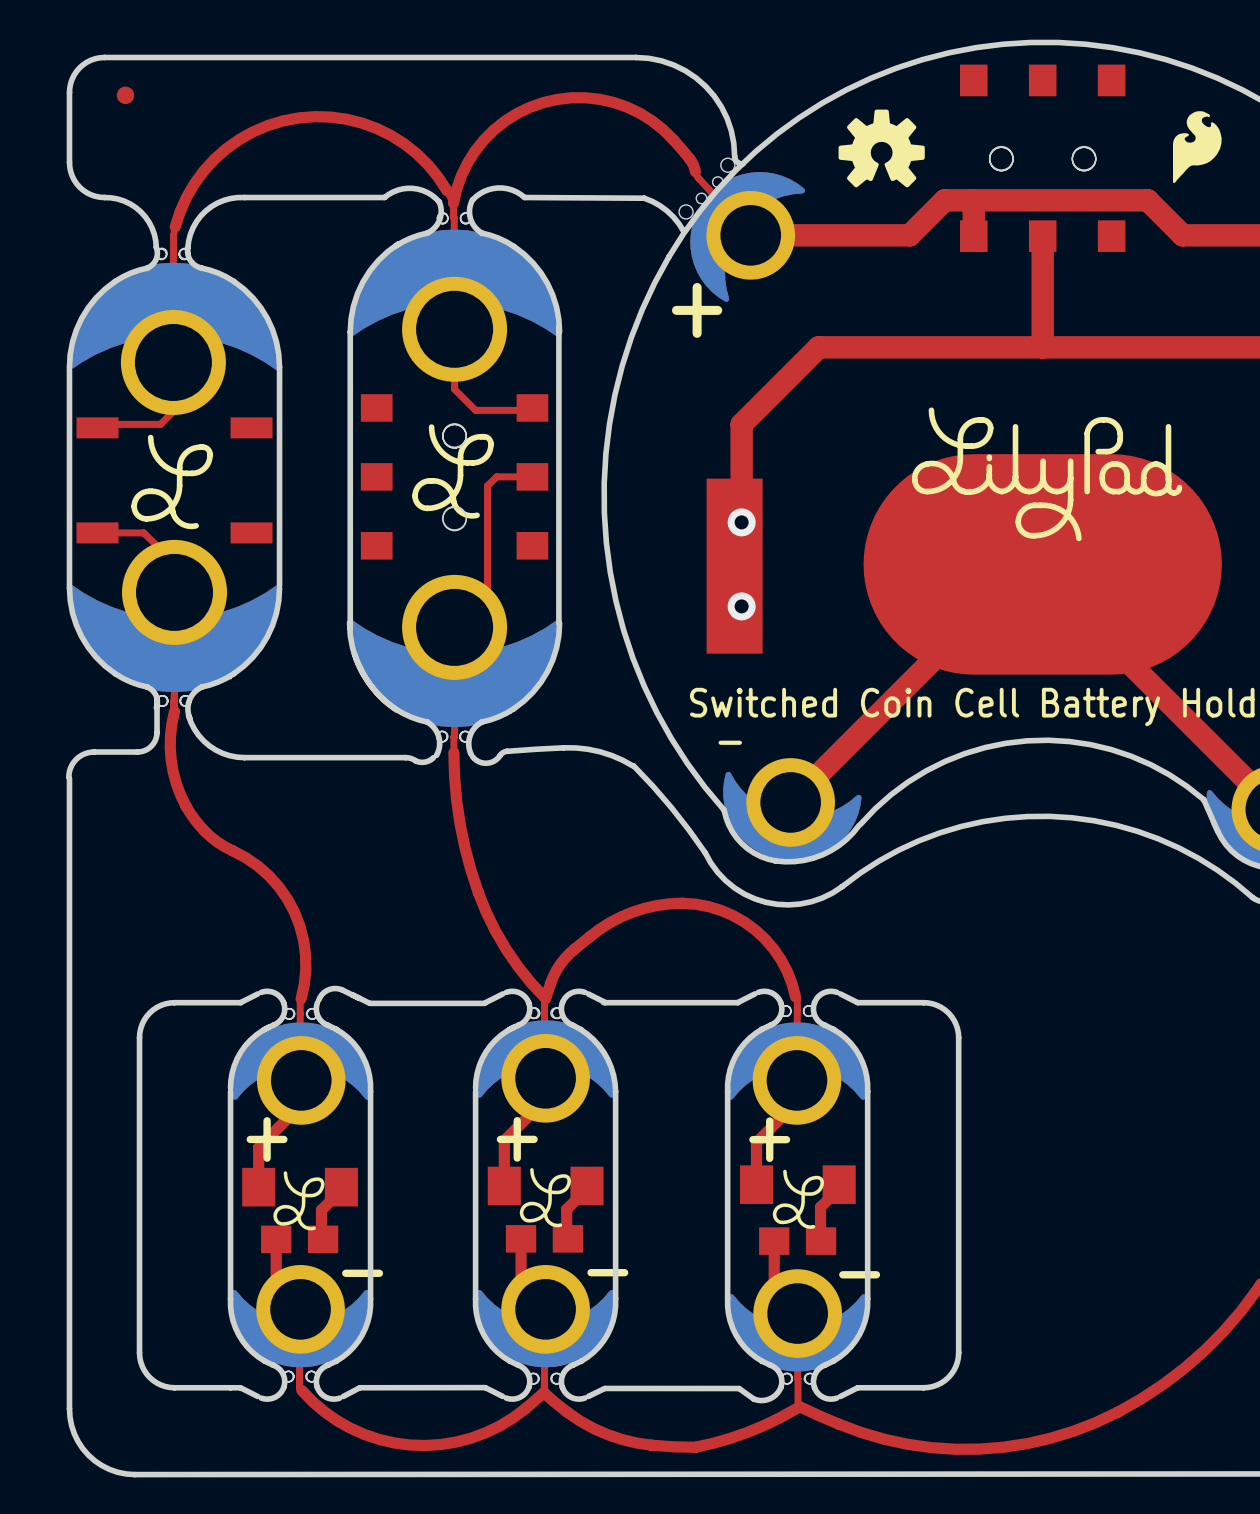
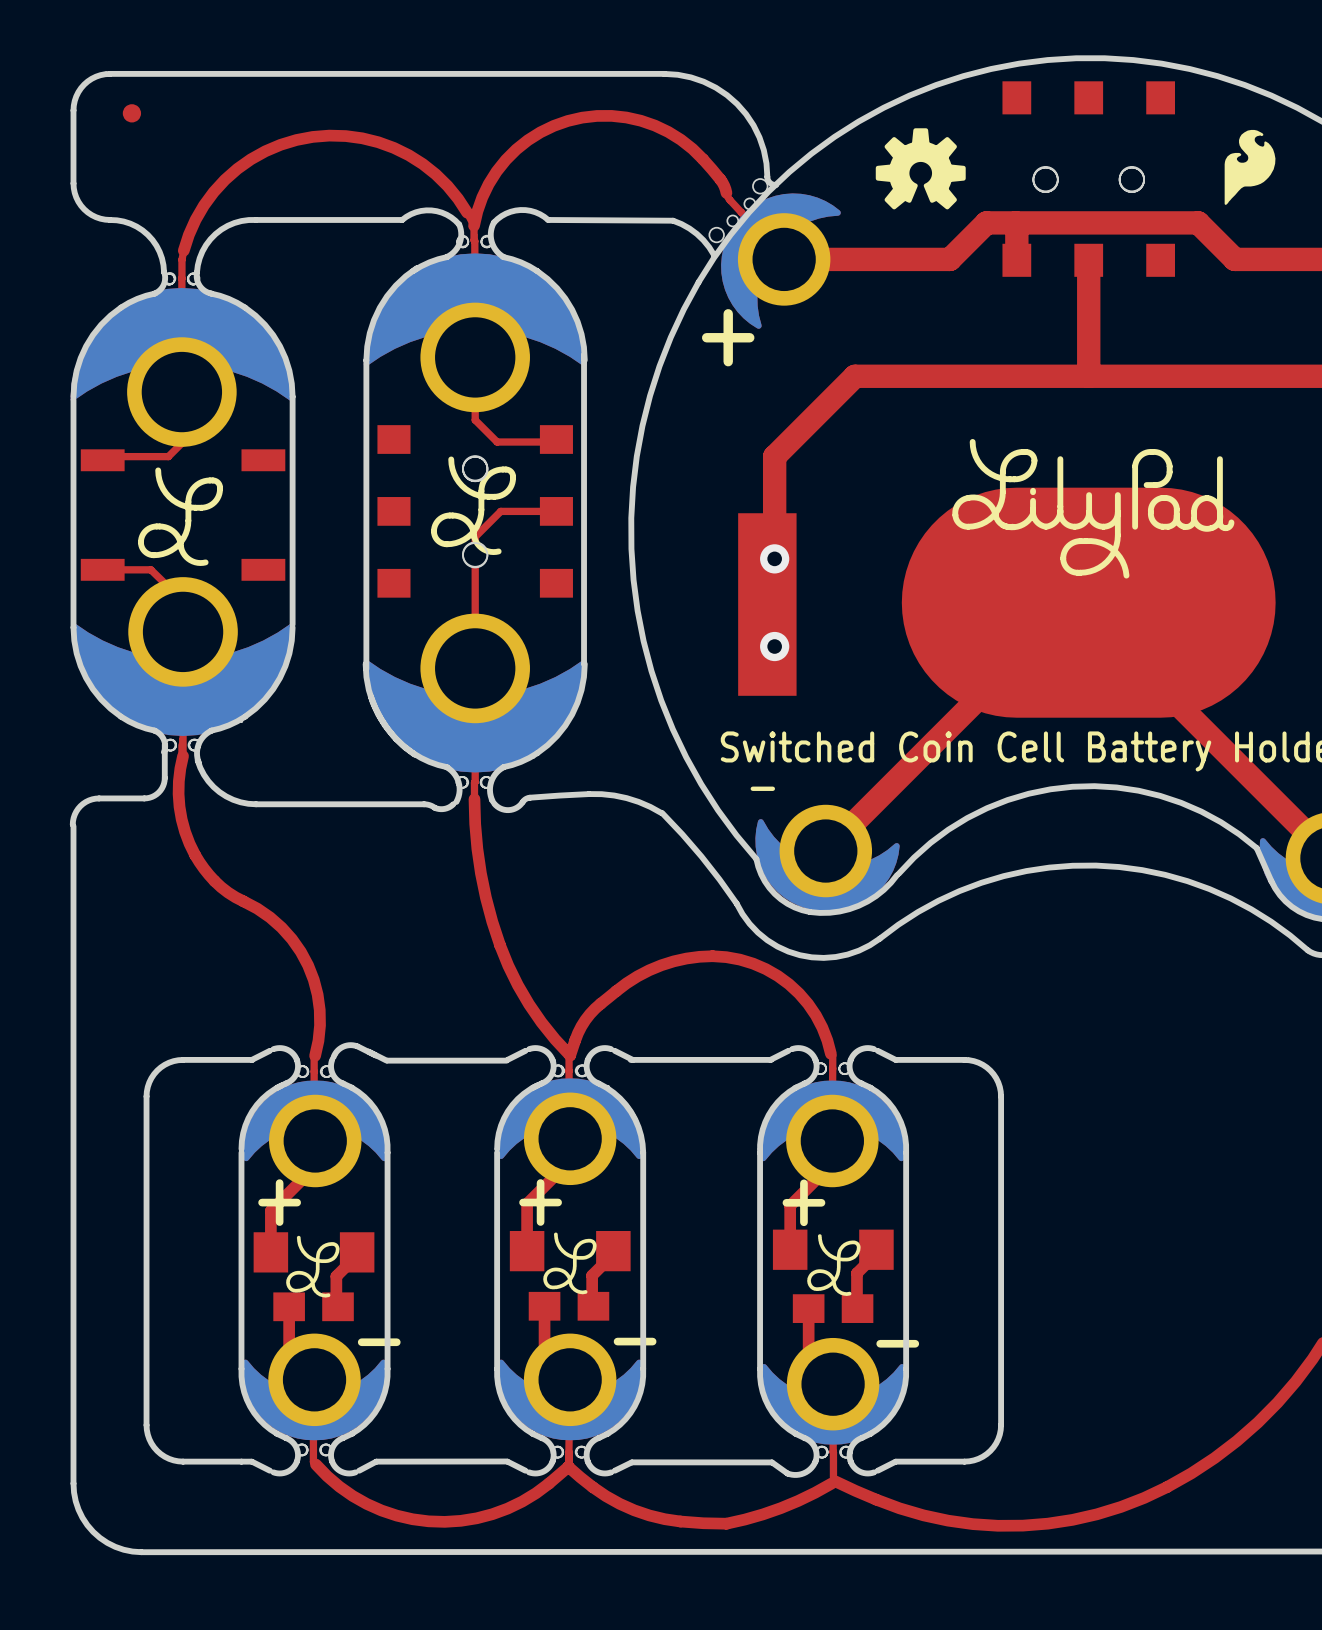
top track: (496, 476) (487, 485) (487, 594) (454, 627) -> (519, 511) (500, 511) (475, 536) (475, 668)

